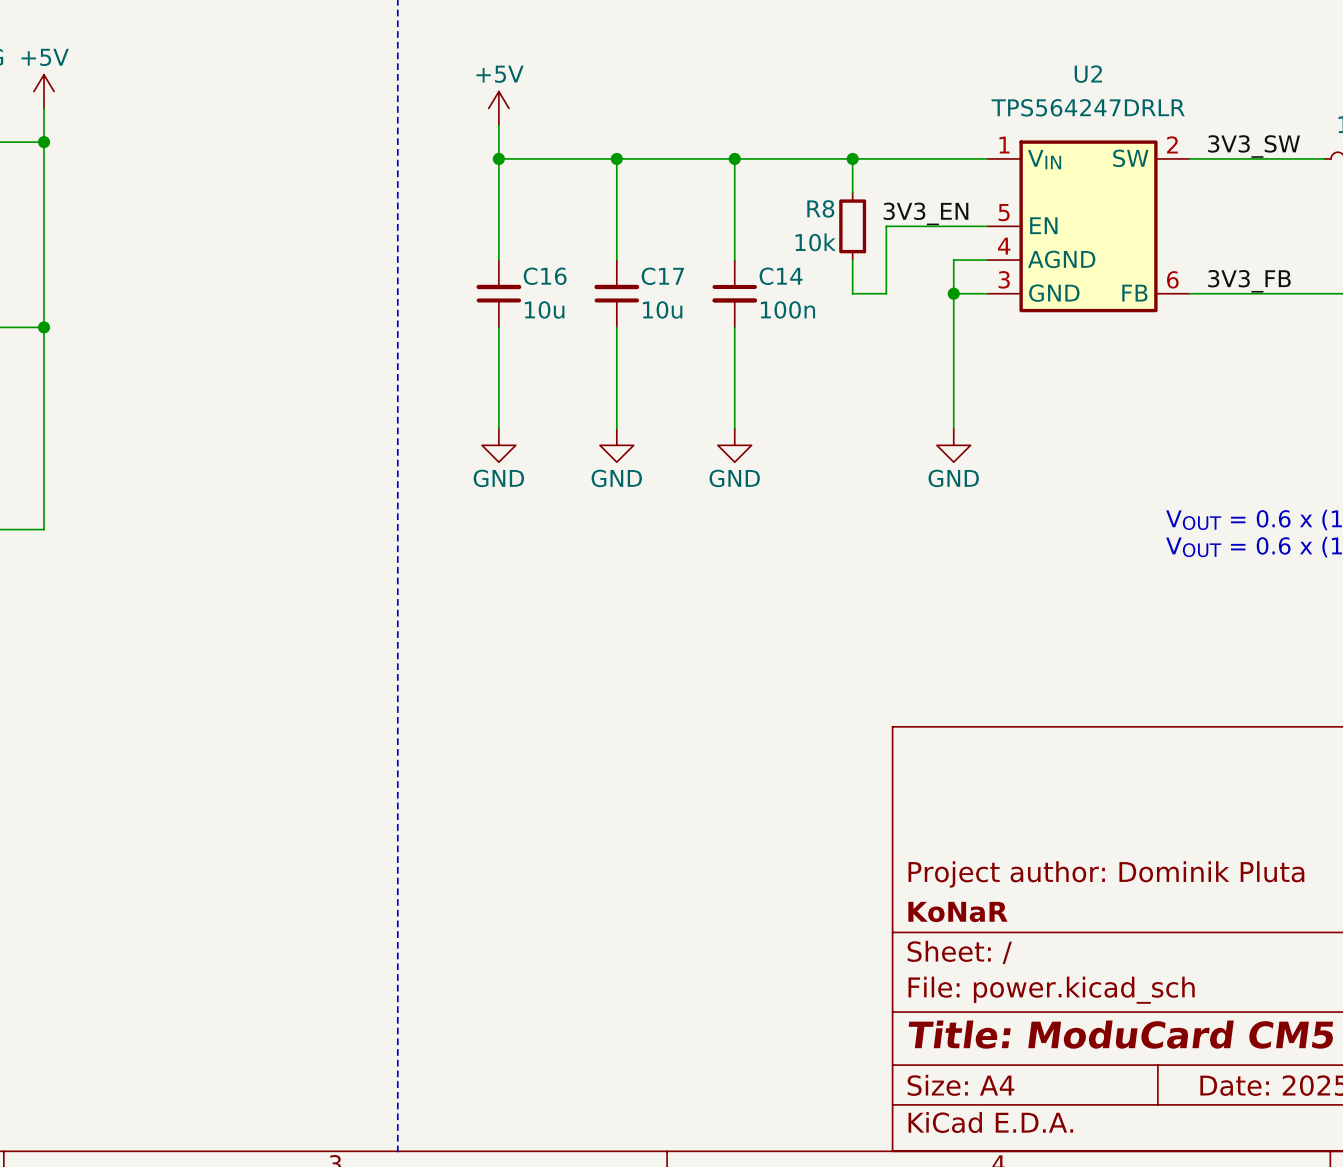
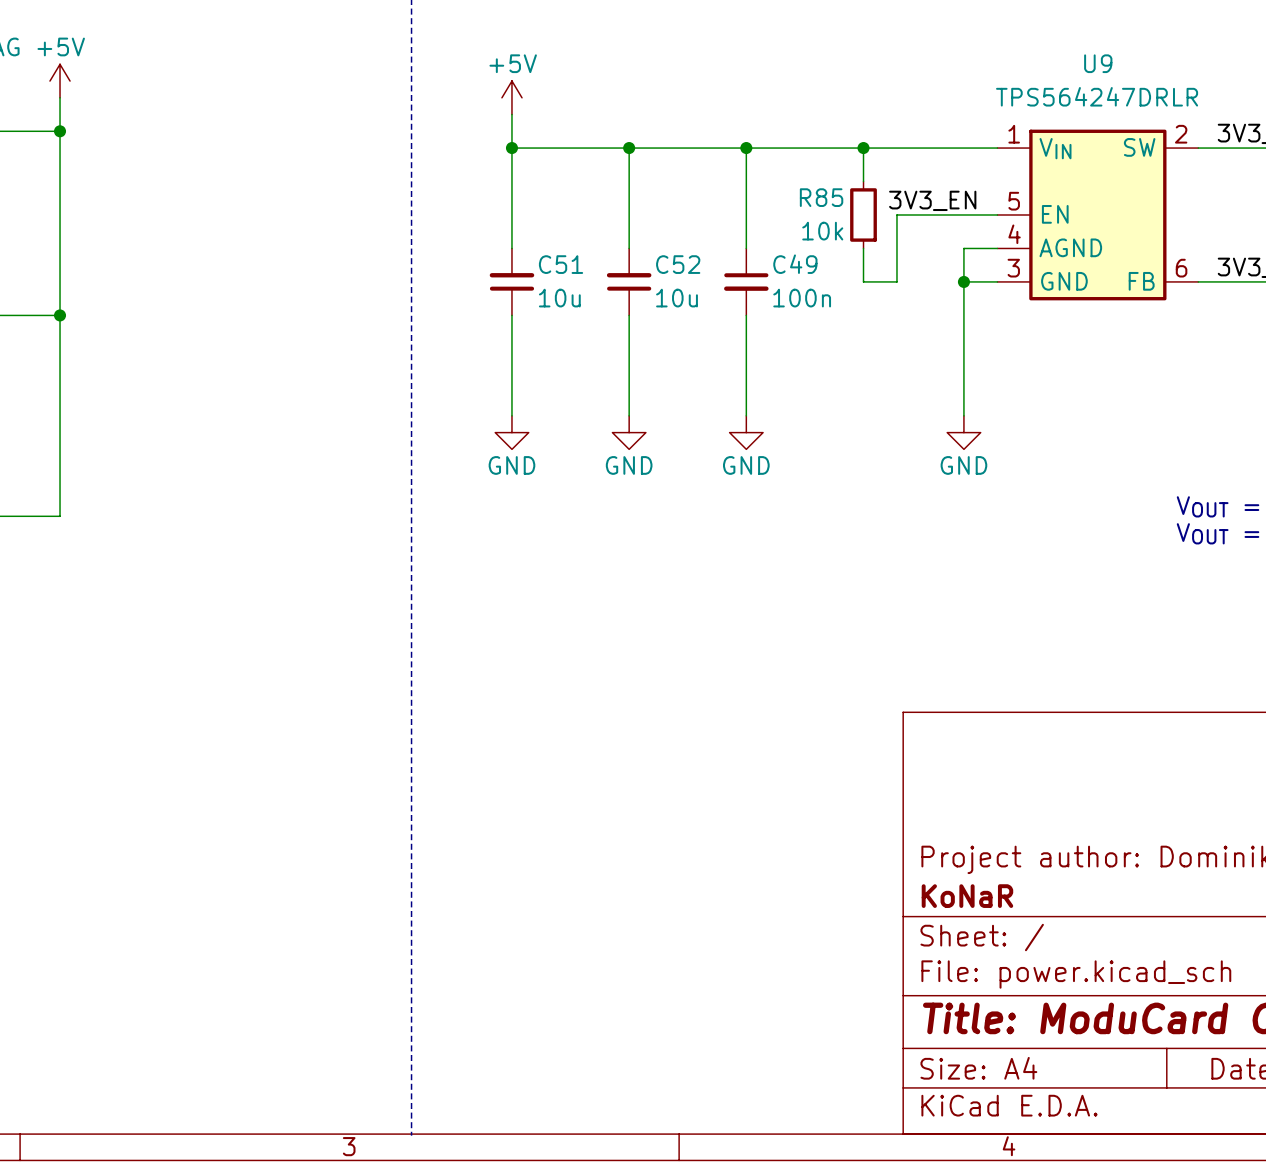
U2 name: U2 (1088, 74) -> U9 (1098, 63)
R8 name: R8 (820, 208) -> R85 (821, 197)
C16 name: C16 (545, 276) -> C51 (561, 264)
C17 name: C17 (662, 276) -> C52 (678, 264)
C14 name: C14 (781, 276) -> C49 (795, 264)

